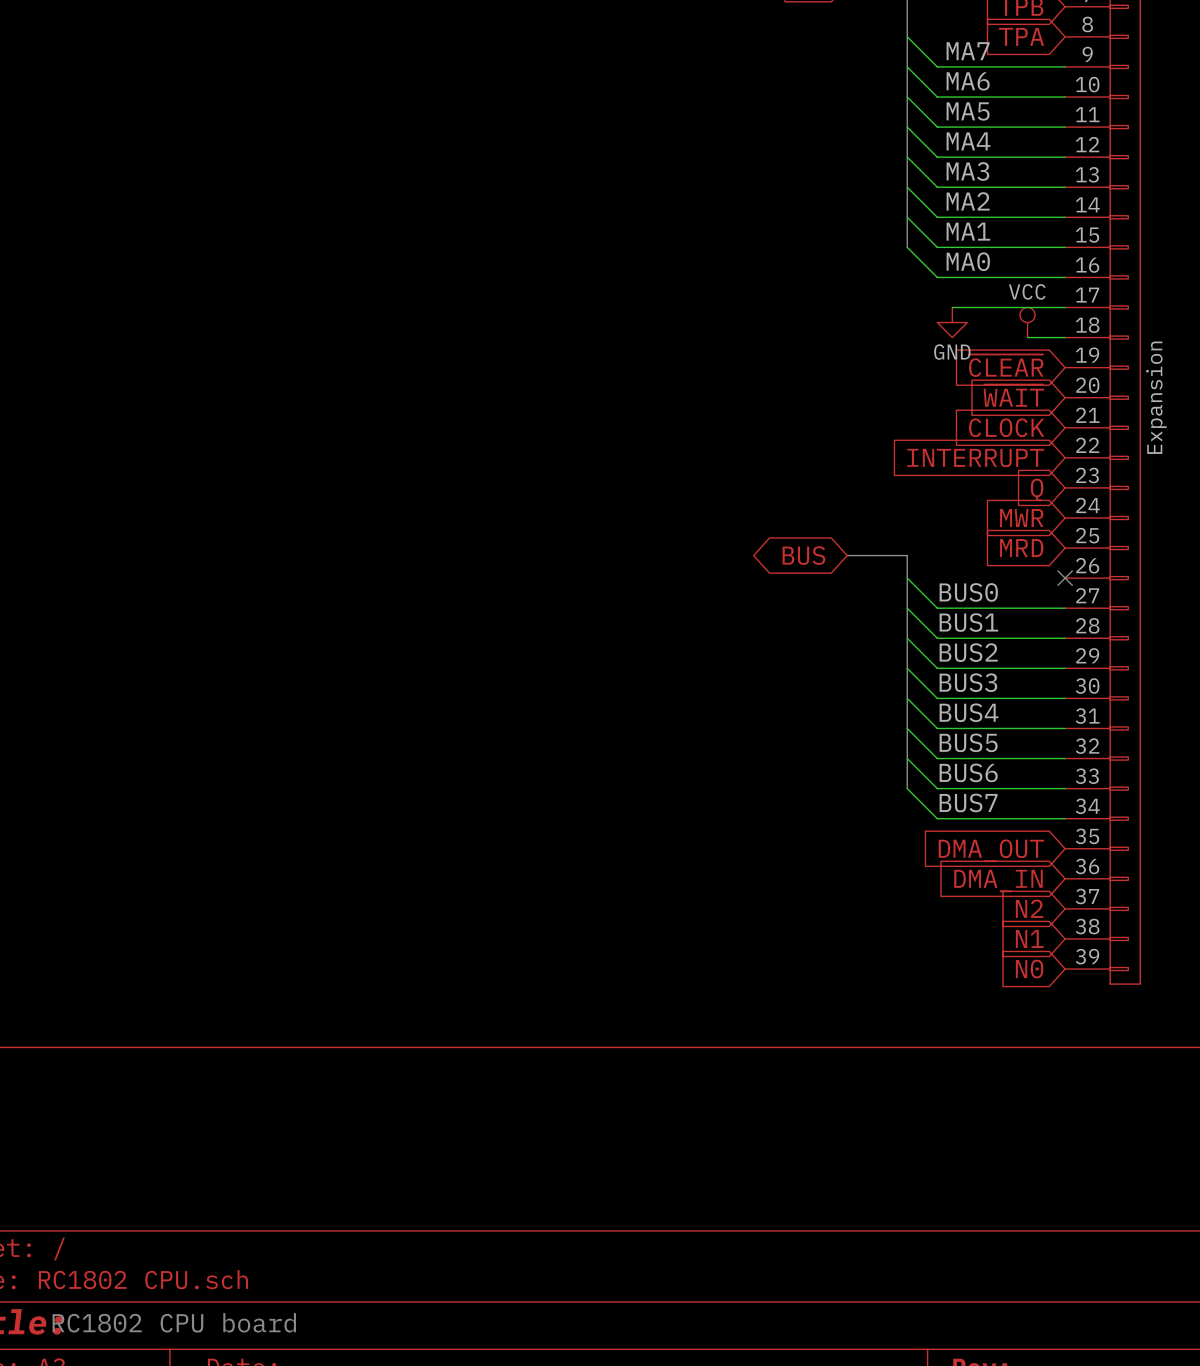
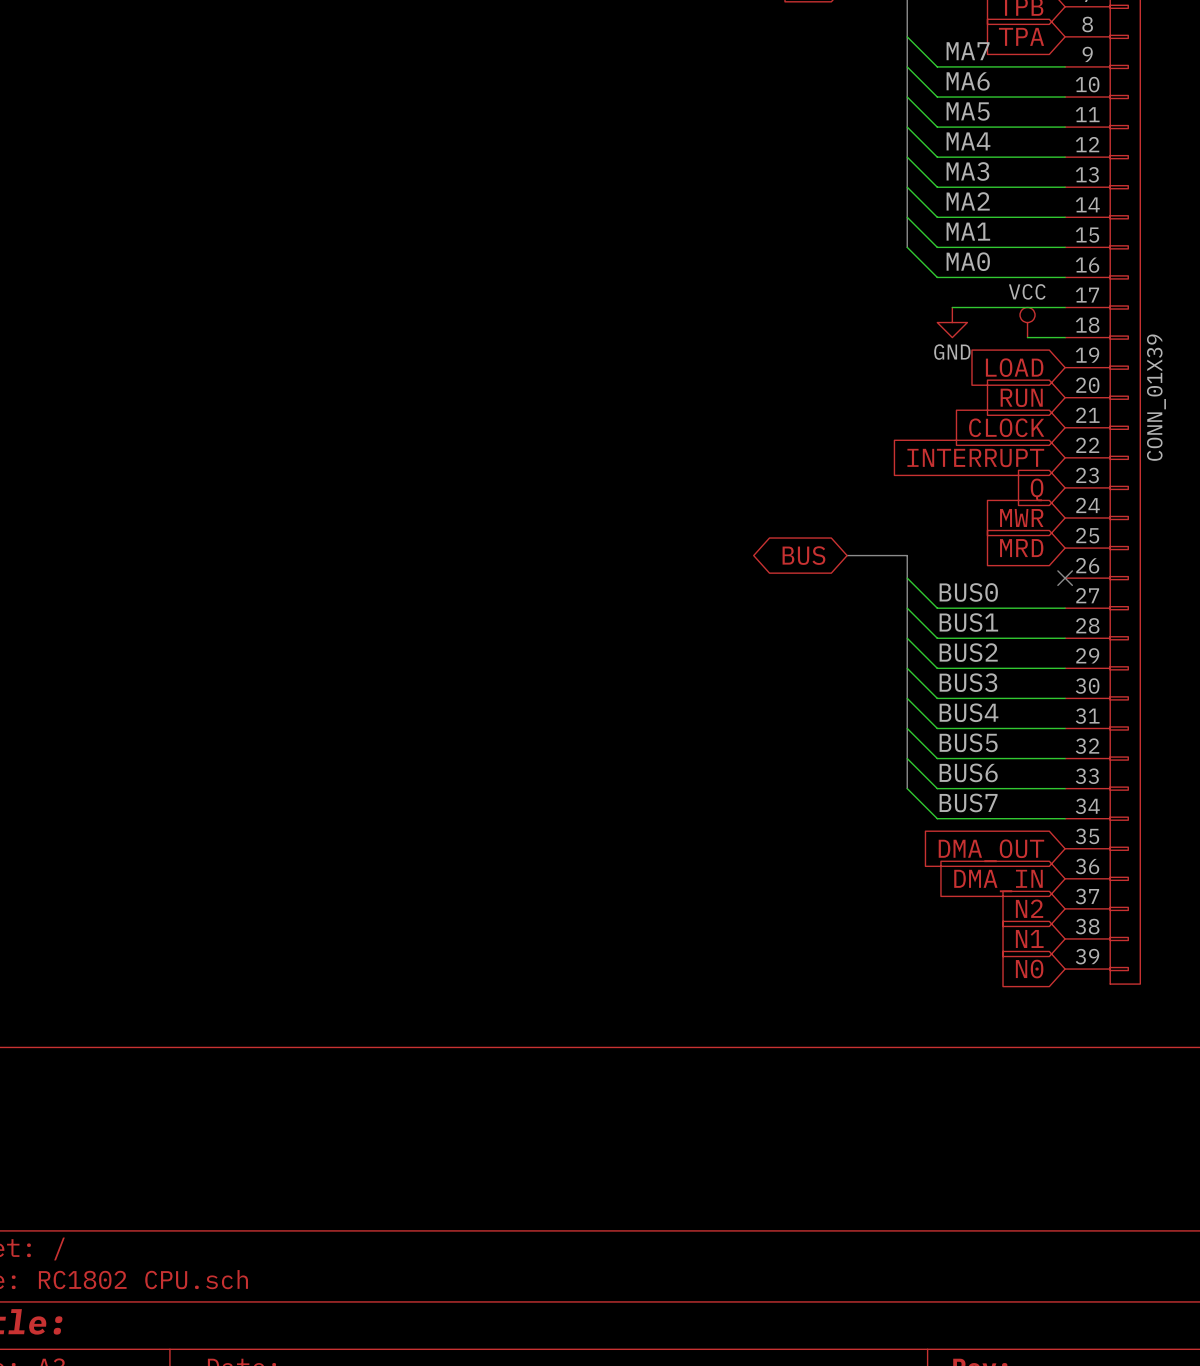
global label: ~{CLEAR} (1006, 365) -> LOAD (1014, 367)
global label: ~{WAIT} (1013, 395) -> RUN (1021, 397)
part value: Expansion (1156, 397) -> CONN_01X39 (1156, 397)
text: RC1802 CPU board (174, 1322) -> none

